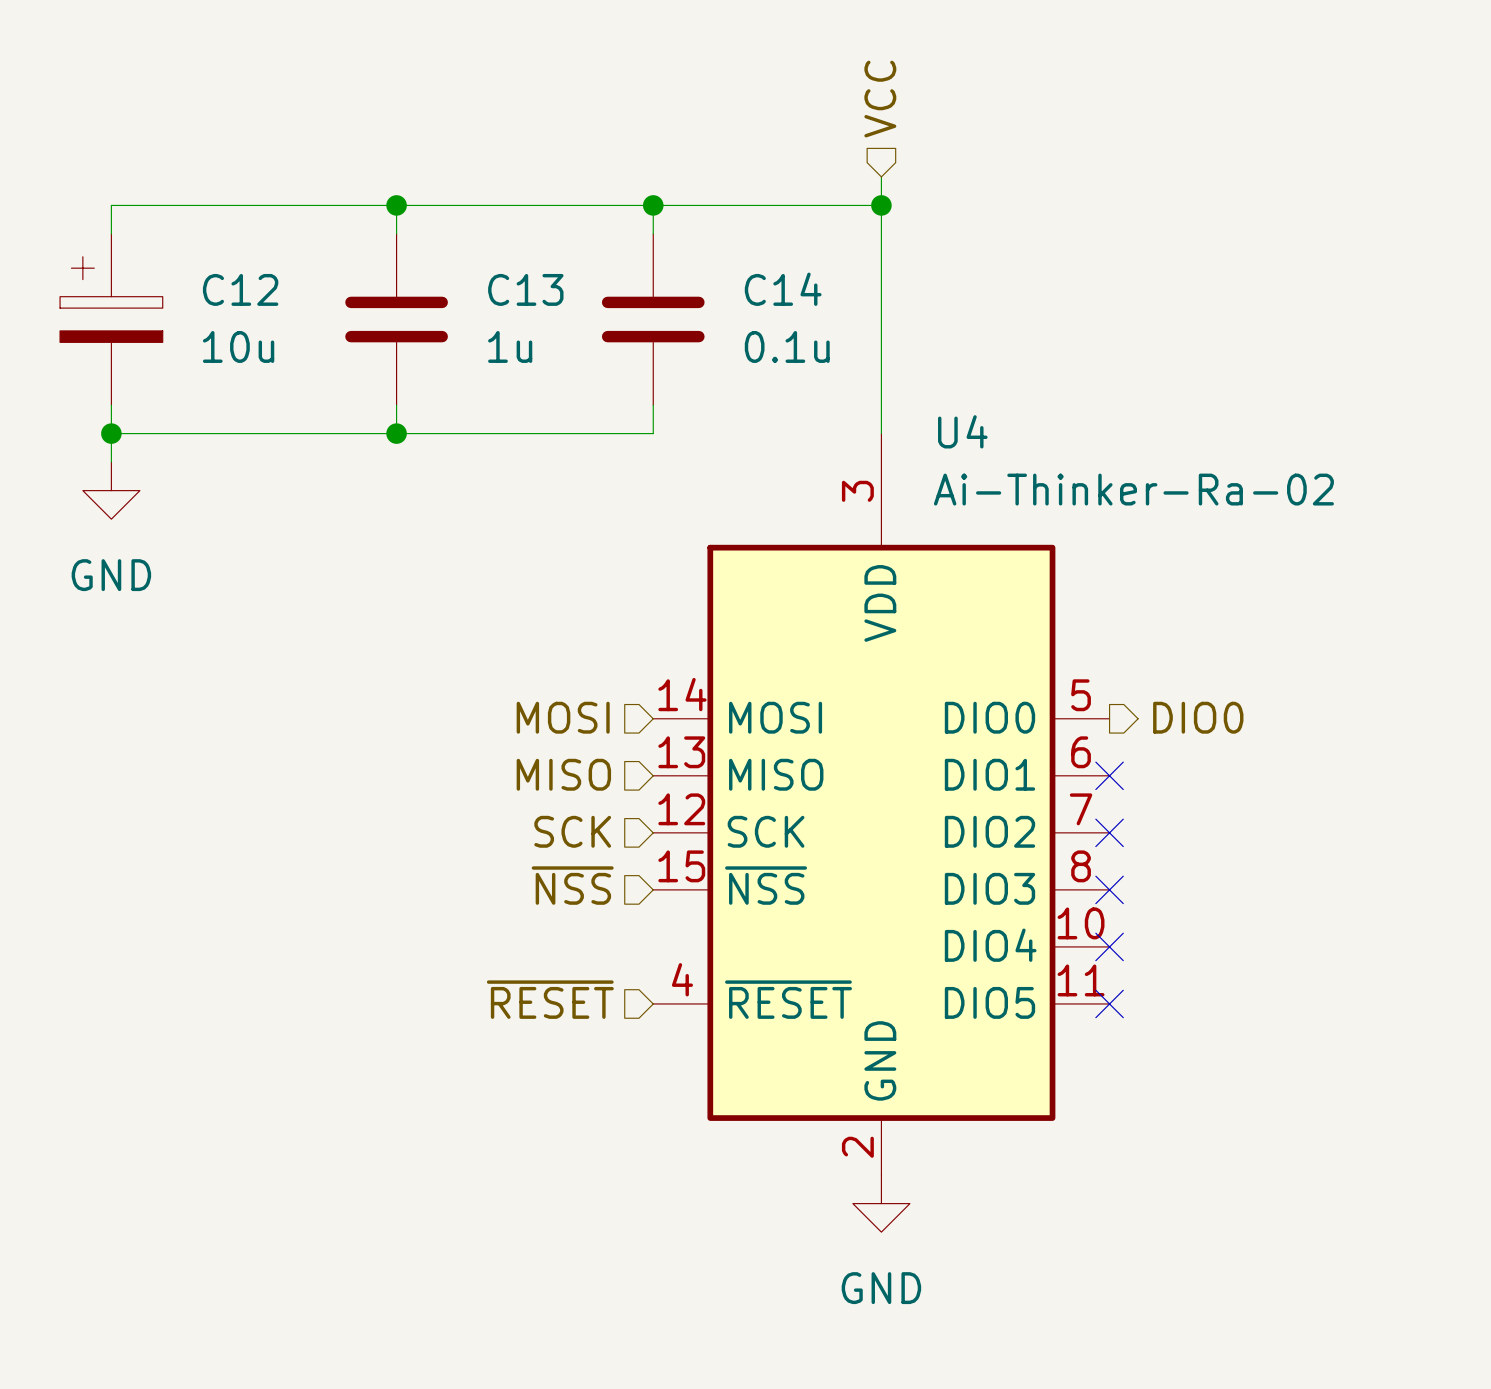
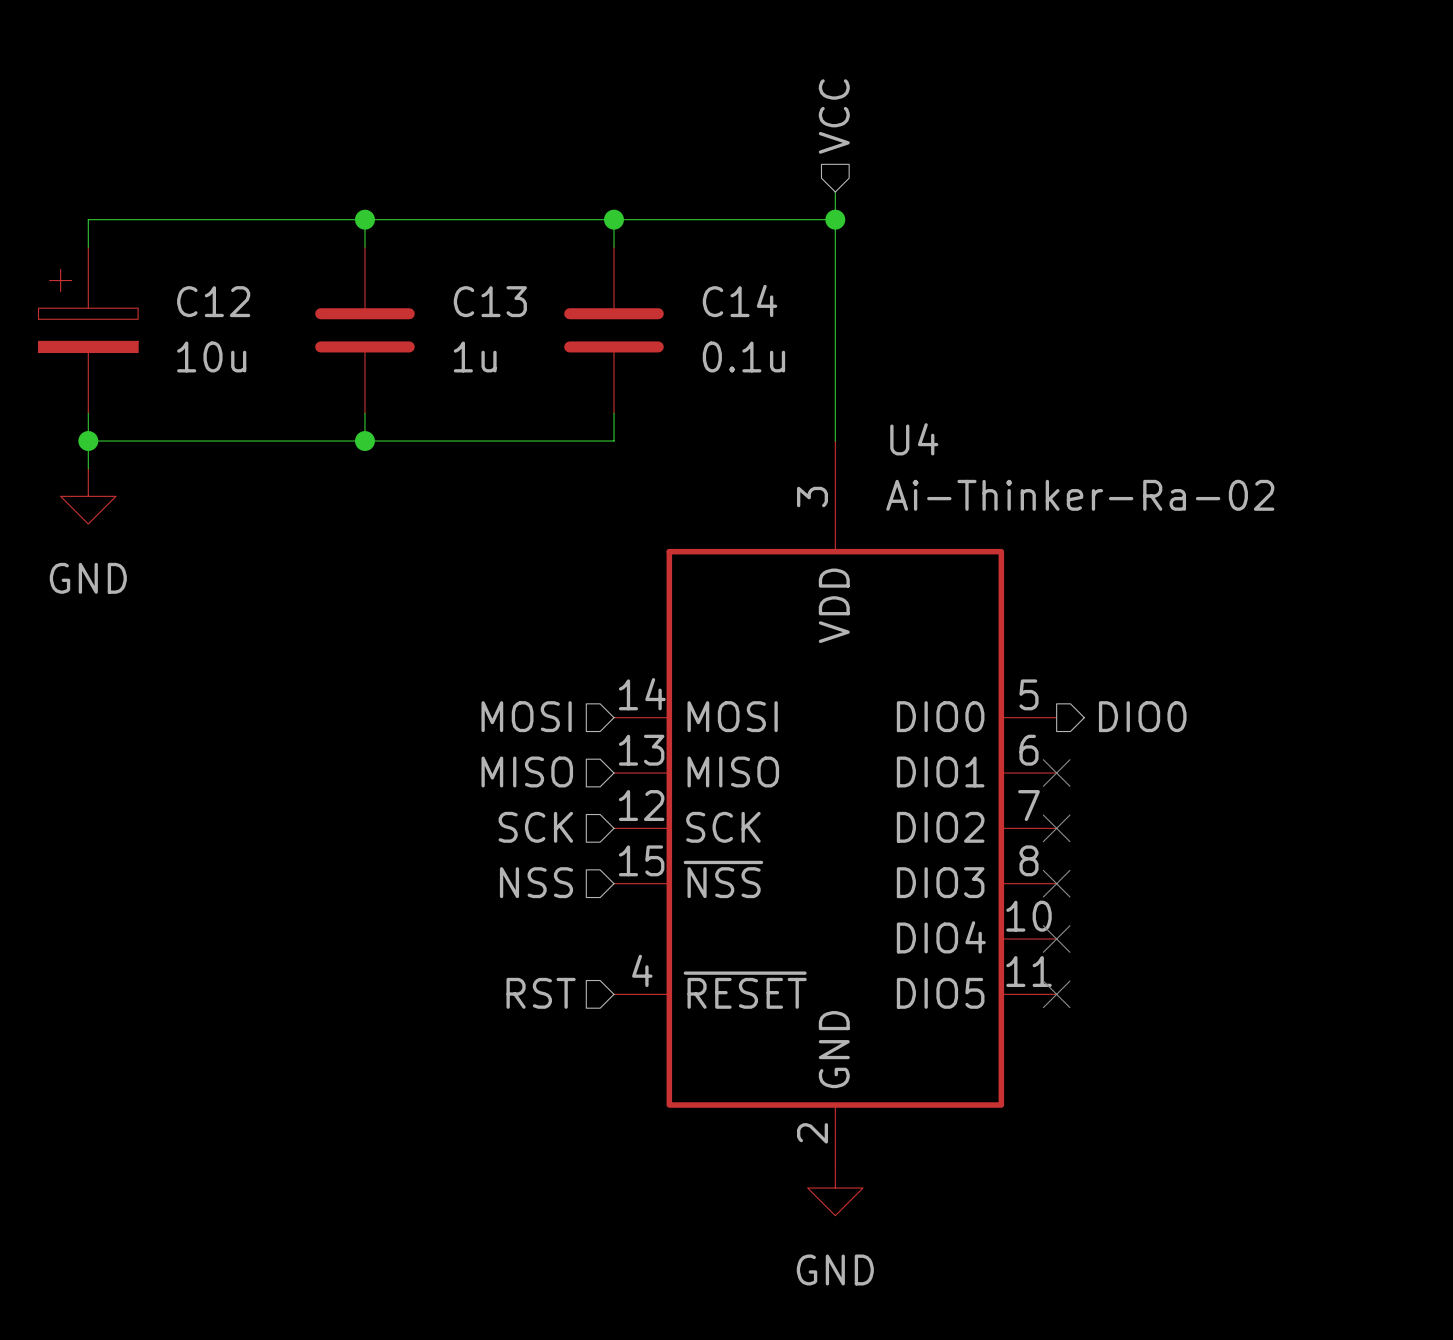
hierarchical label: ~{NSS} (572, 885) -> NSS (536, 882)
hierarchical label: ~{RESET} (550, 999) -> RST (541, 993)

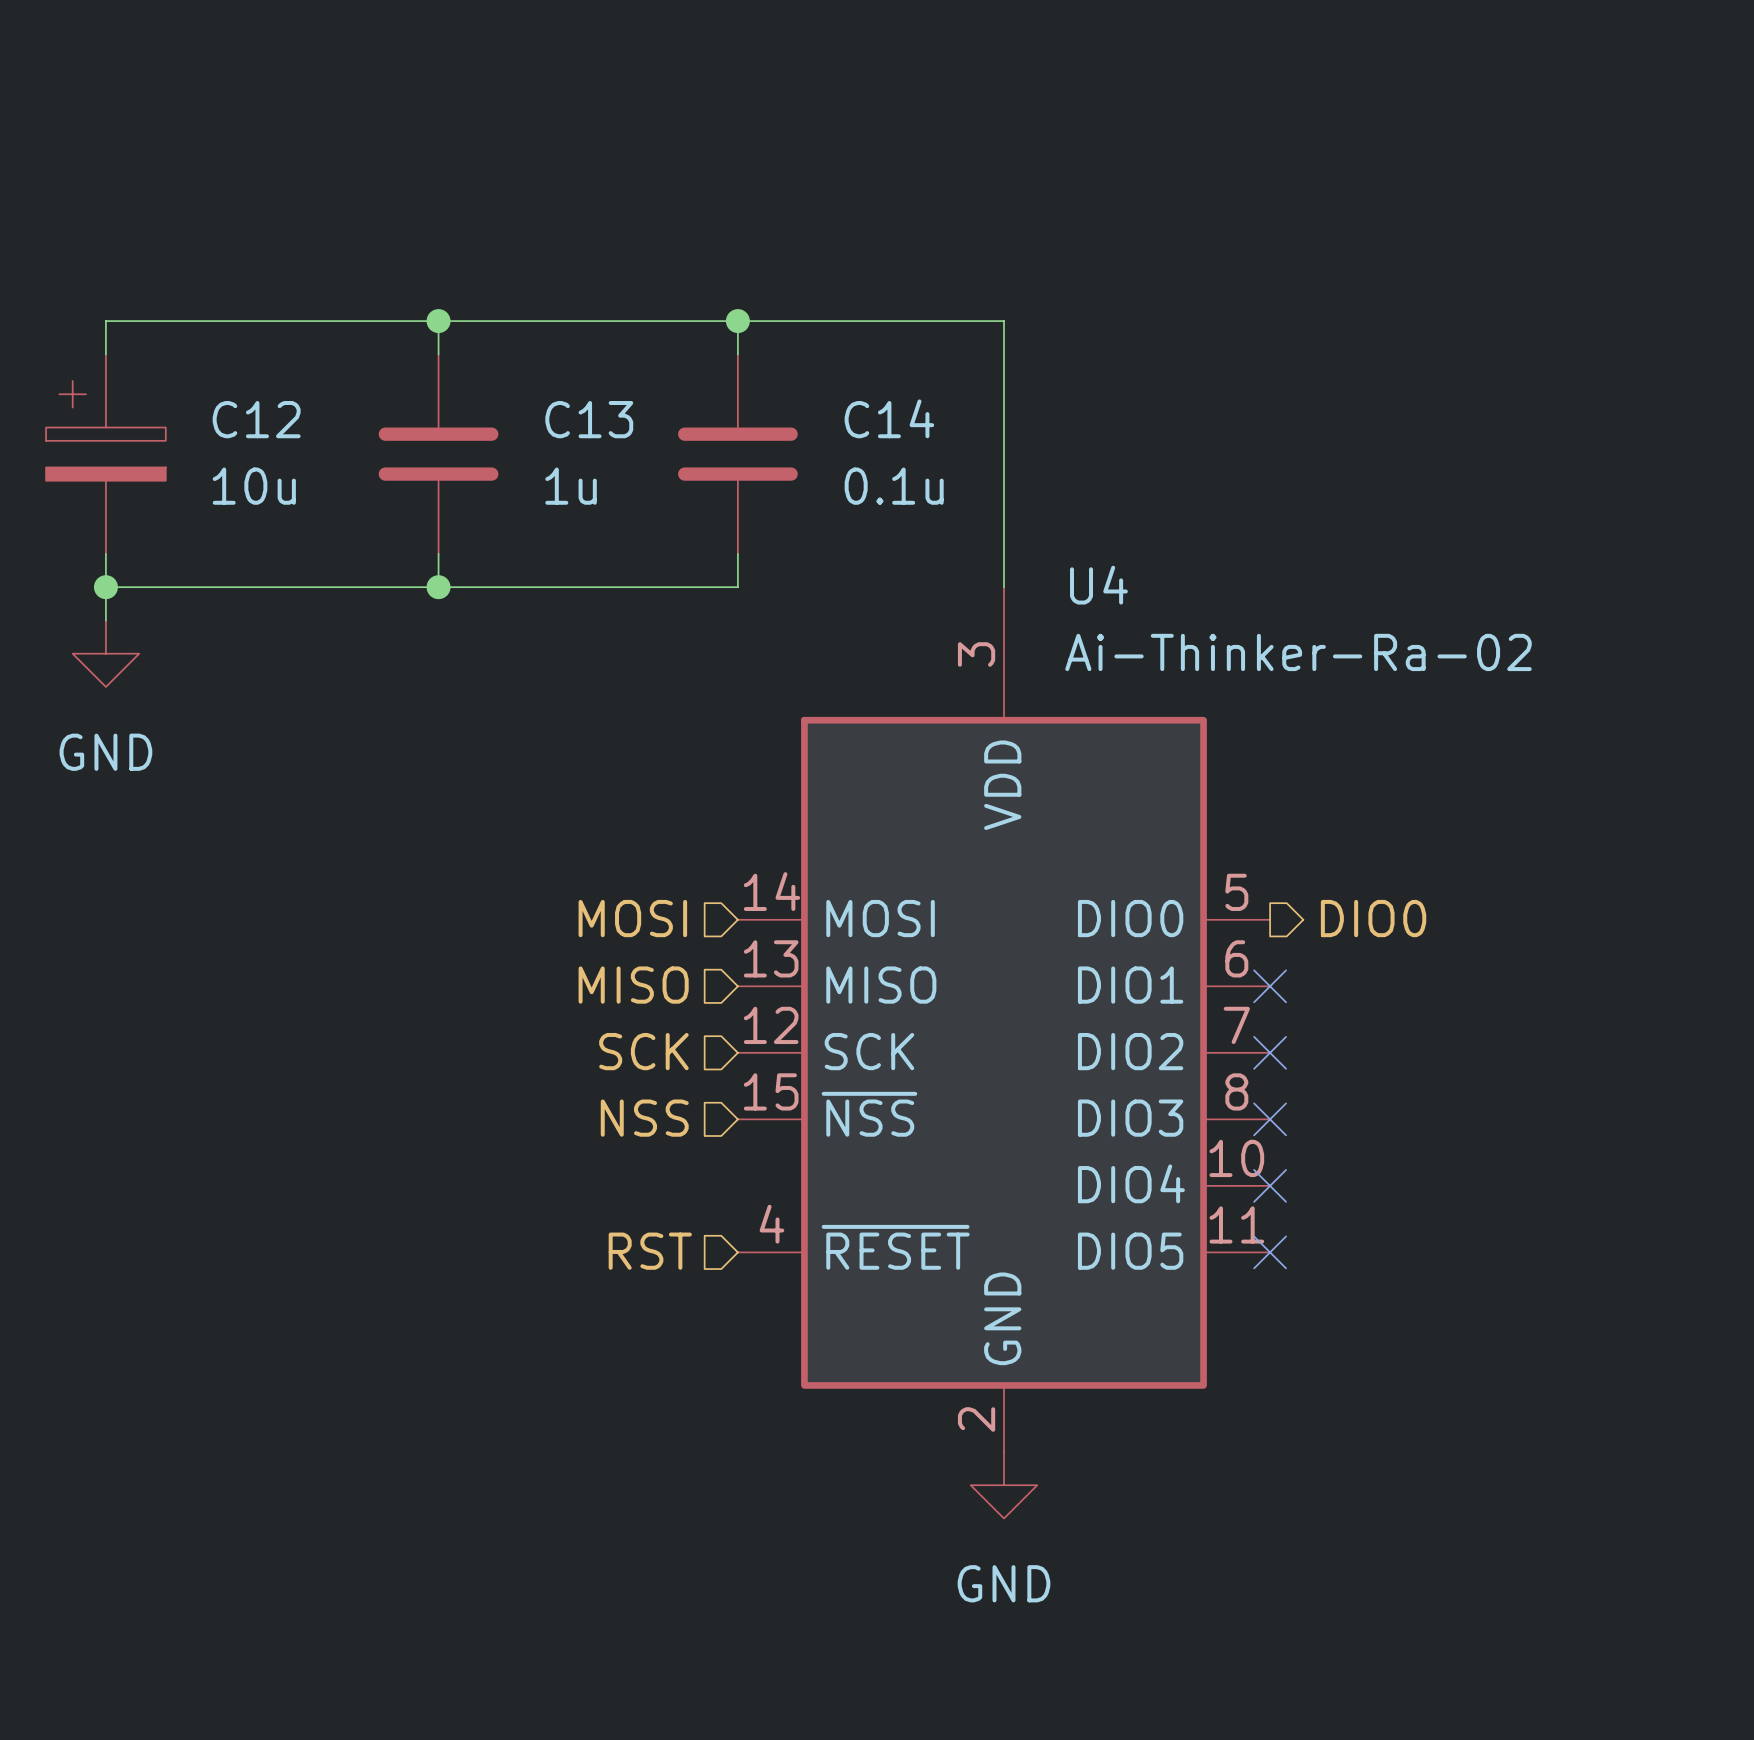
hierarchical label: VCC (834, 116) -> none
wire: (835, 192) (835, 219) -> none
junction: (835, 219) -> none

